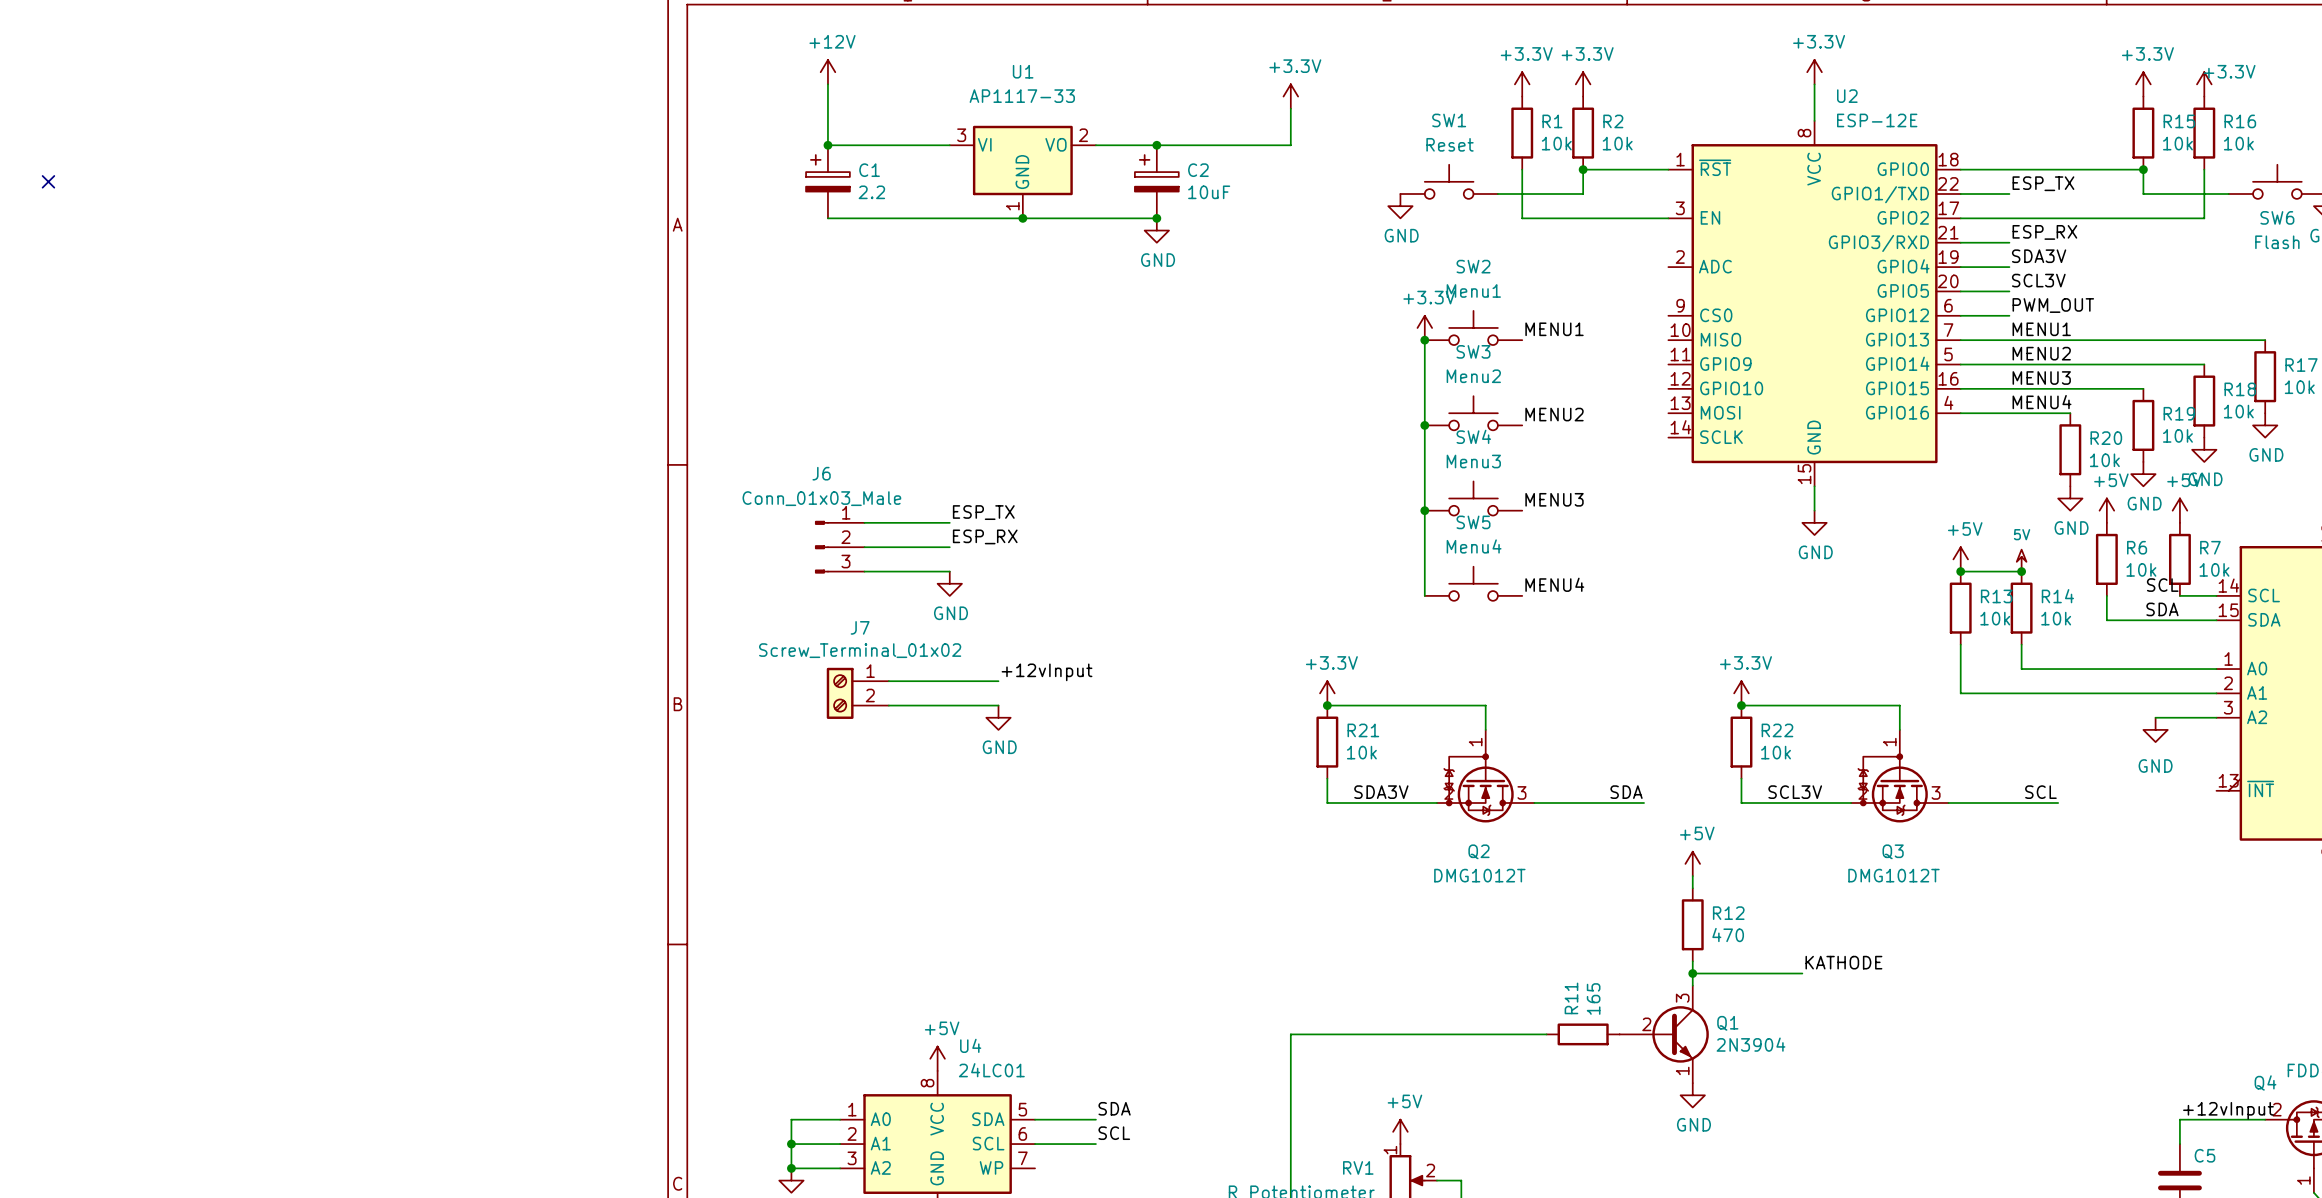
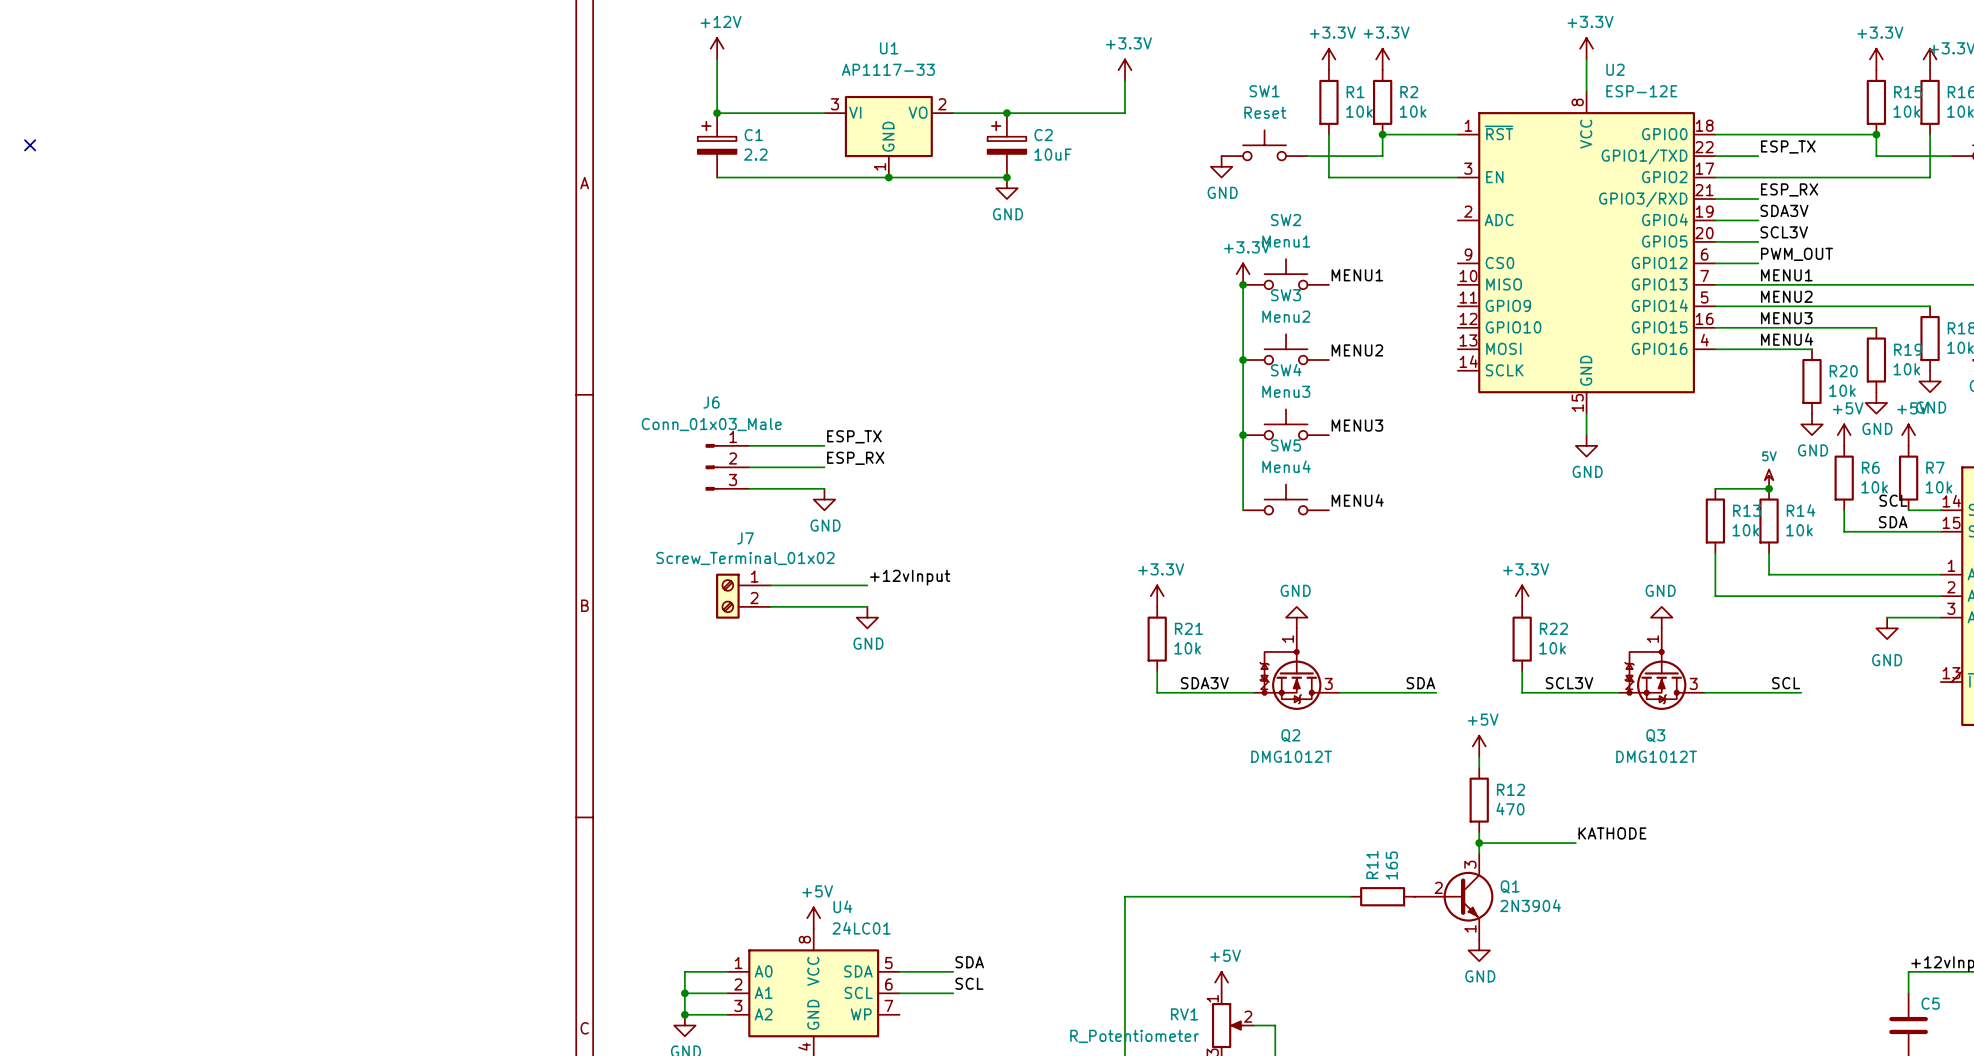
power symbol: +5V (1960, 559) -> none
junction: (1960, 571) -> none
wire: (1327, 705) (1485, 705) (1485, 729) -> none
junction: (1327, 705) -> none
wire: (1741, 705) (1899, 705) (1899, 729) -> none
junction: (1741, 705) -> none
power symbol: none -> GND (1296, 617)
power symbol: none -> GND (1661, 617)

